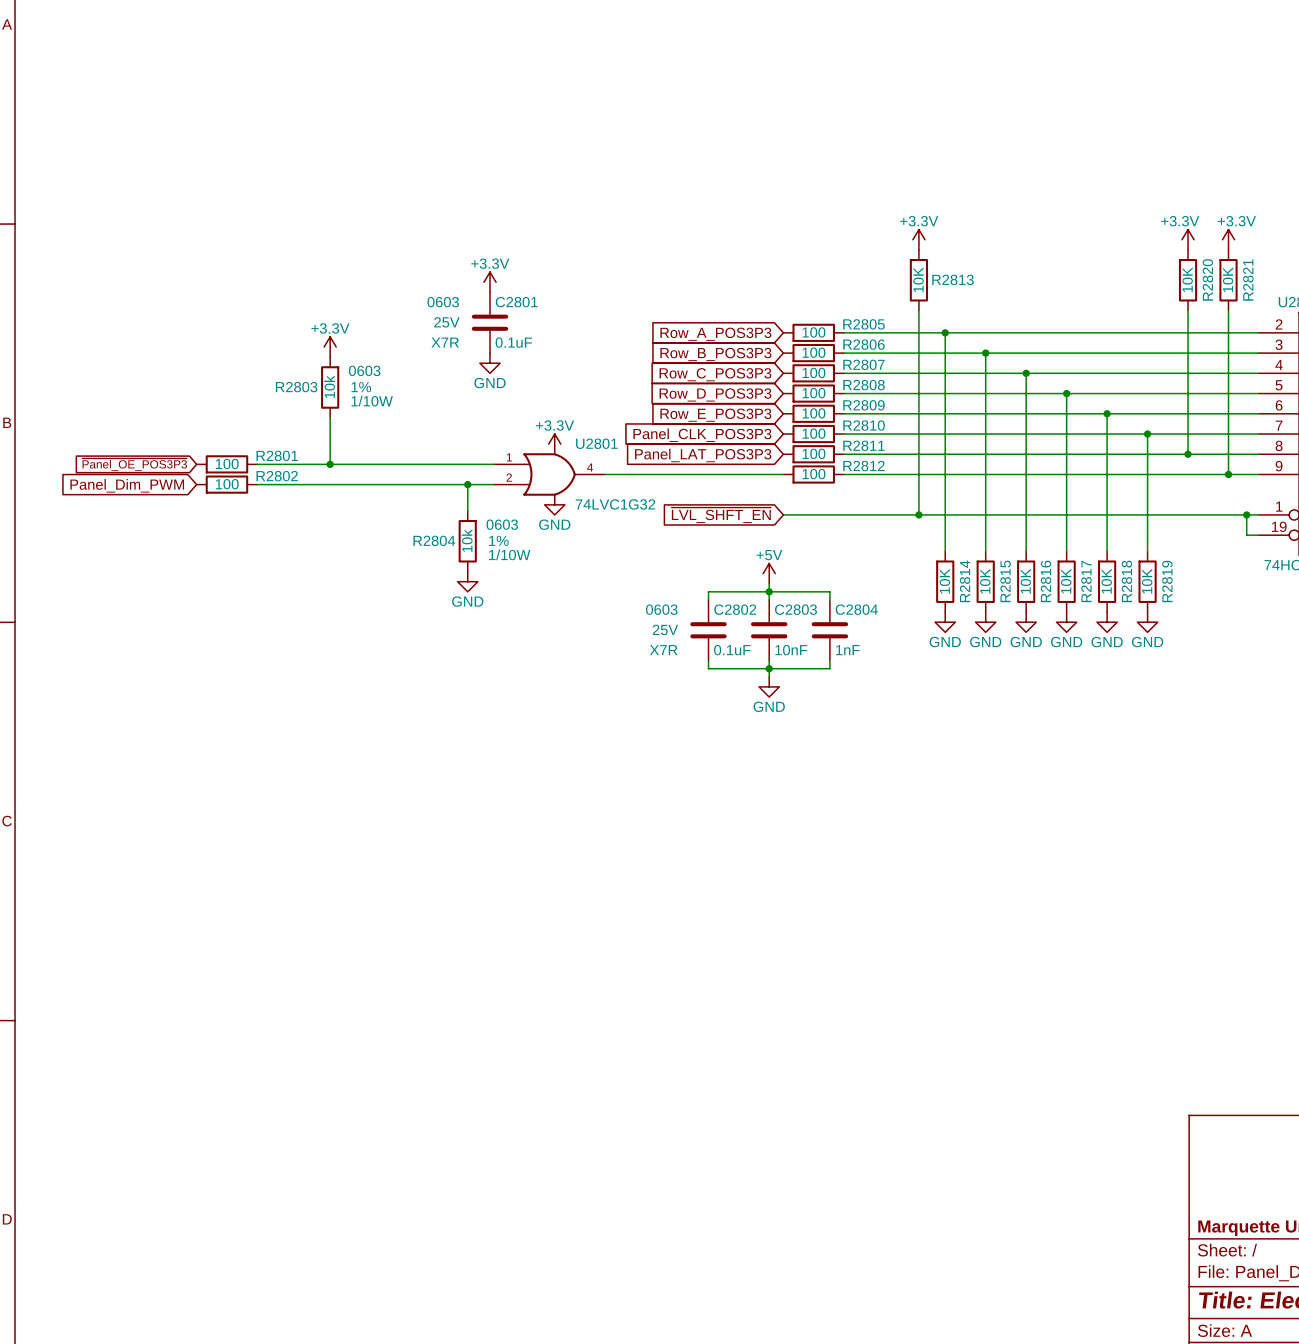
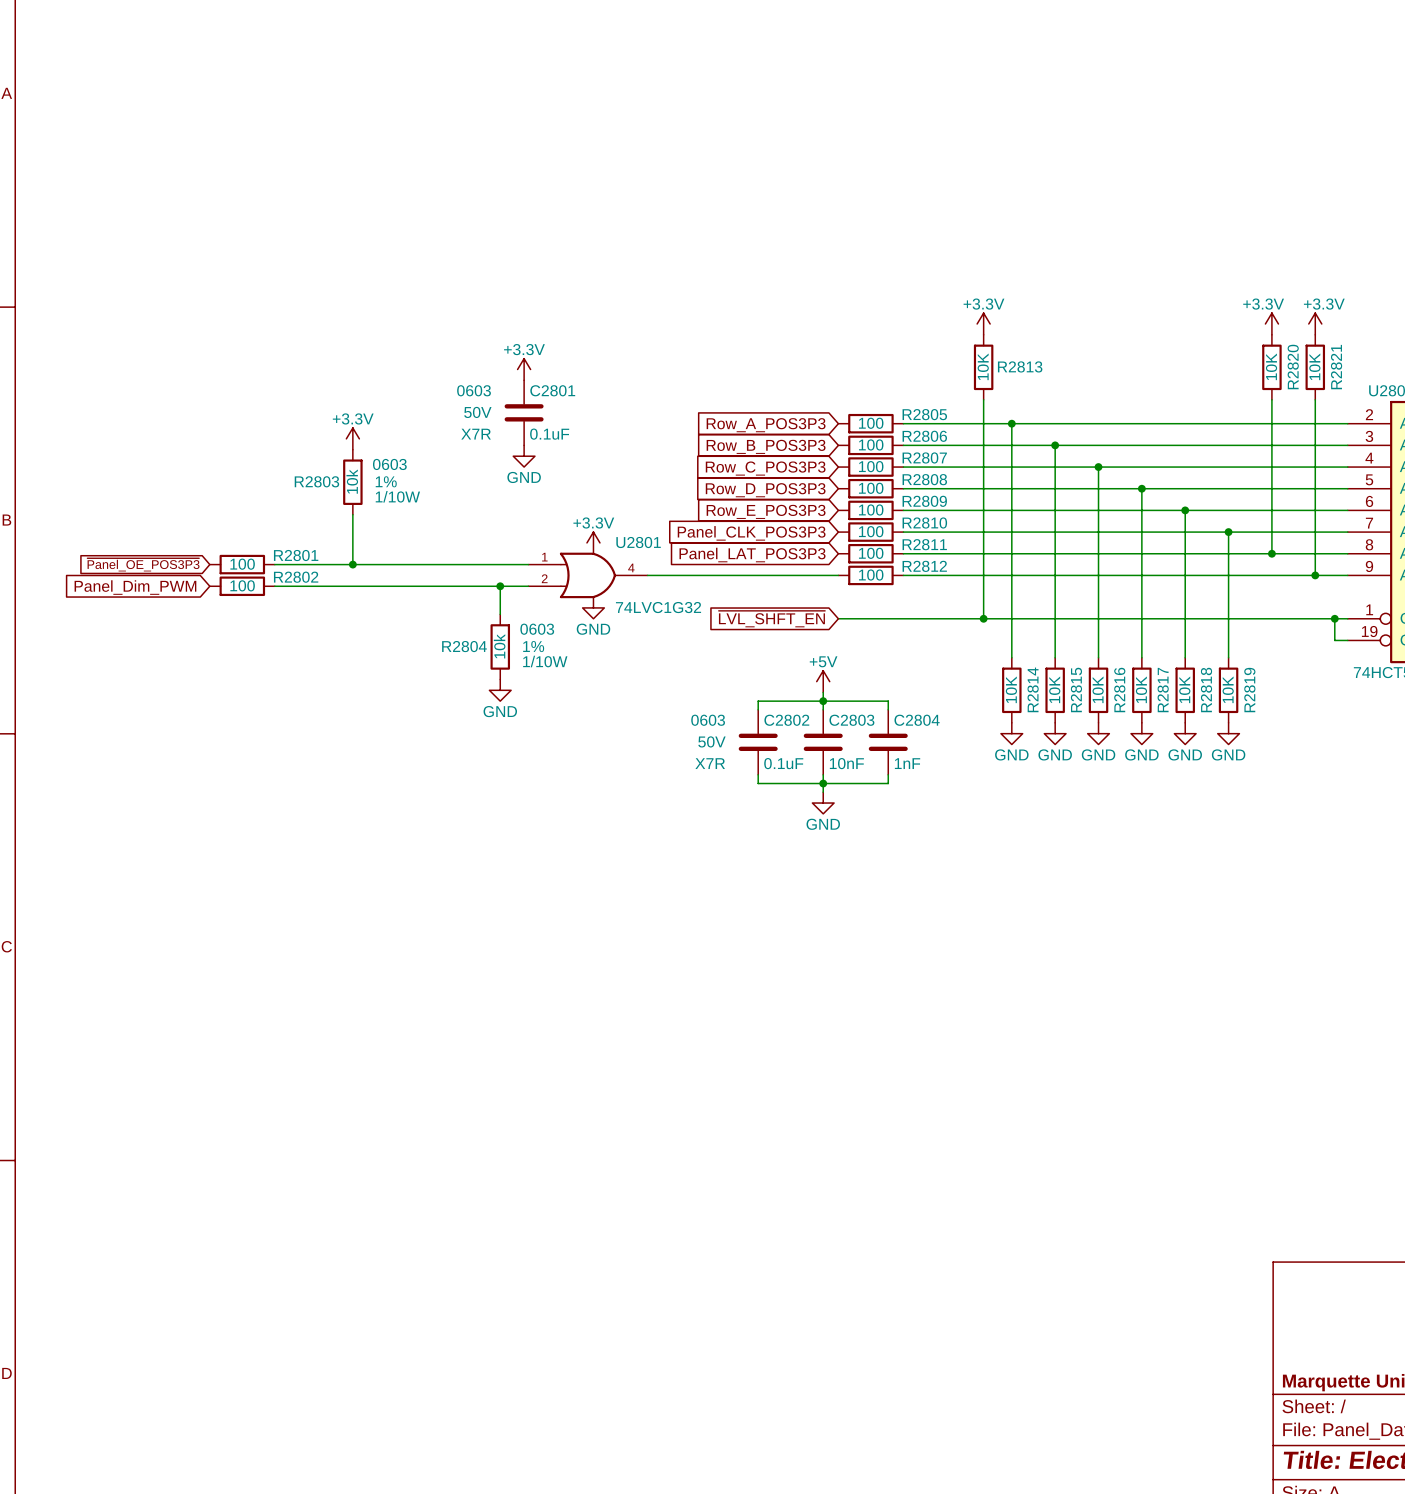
C2801 text: 25V (446, 322) -> 50V (477, 412)
C2802 text: 25V (665, 629) -> 50V (711, 741)

